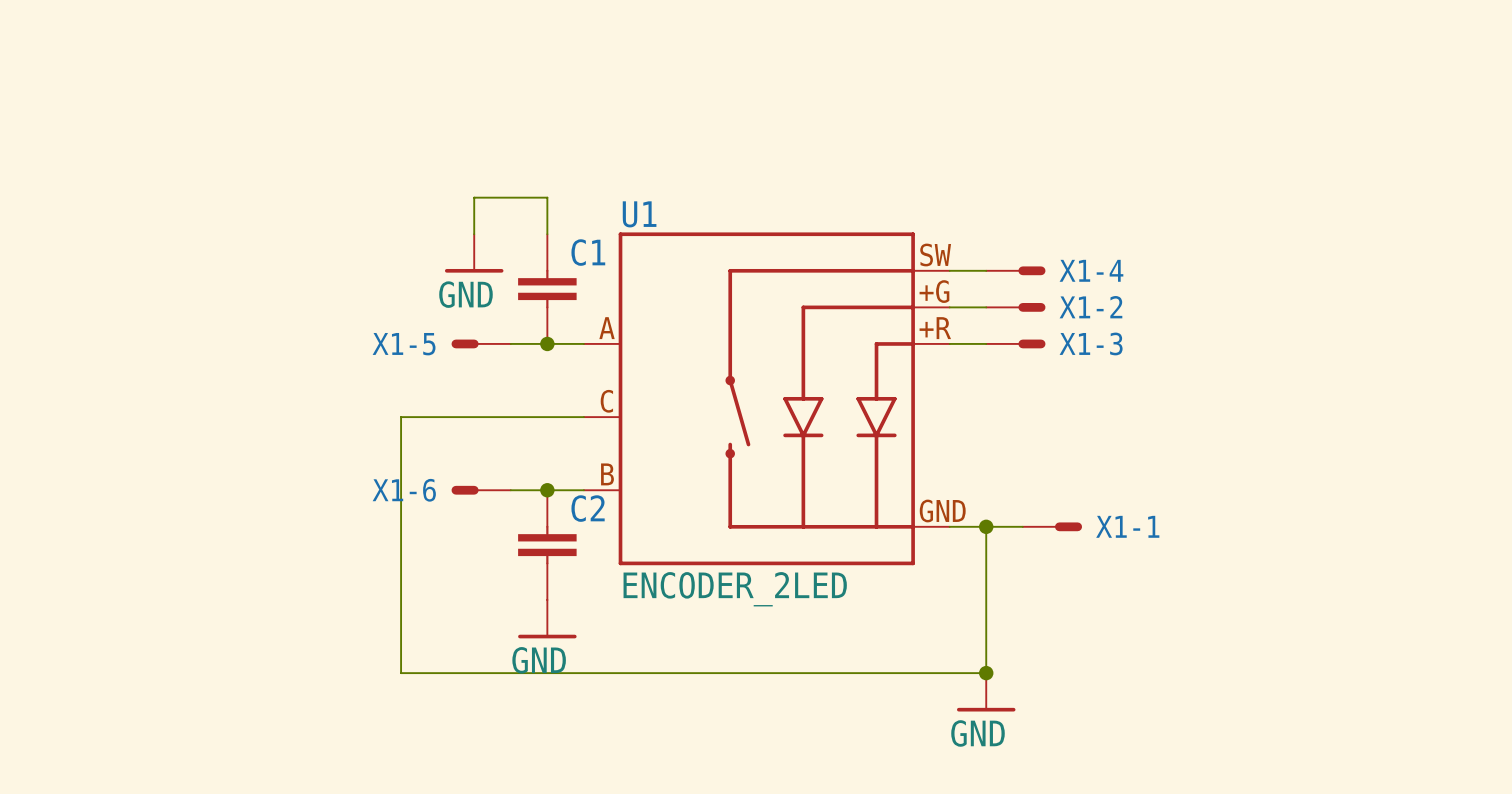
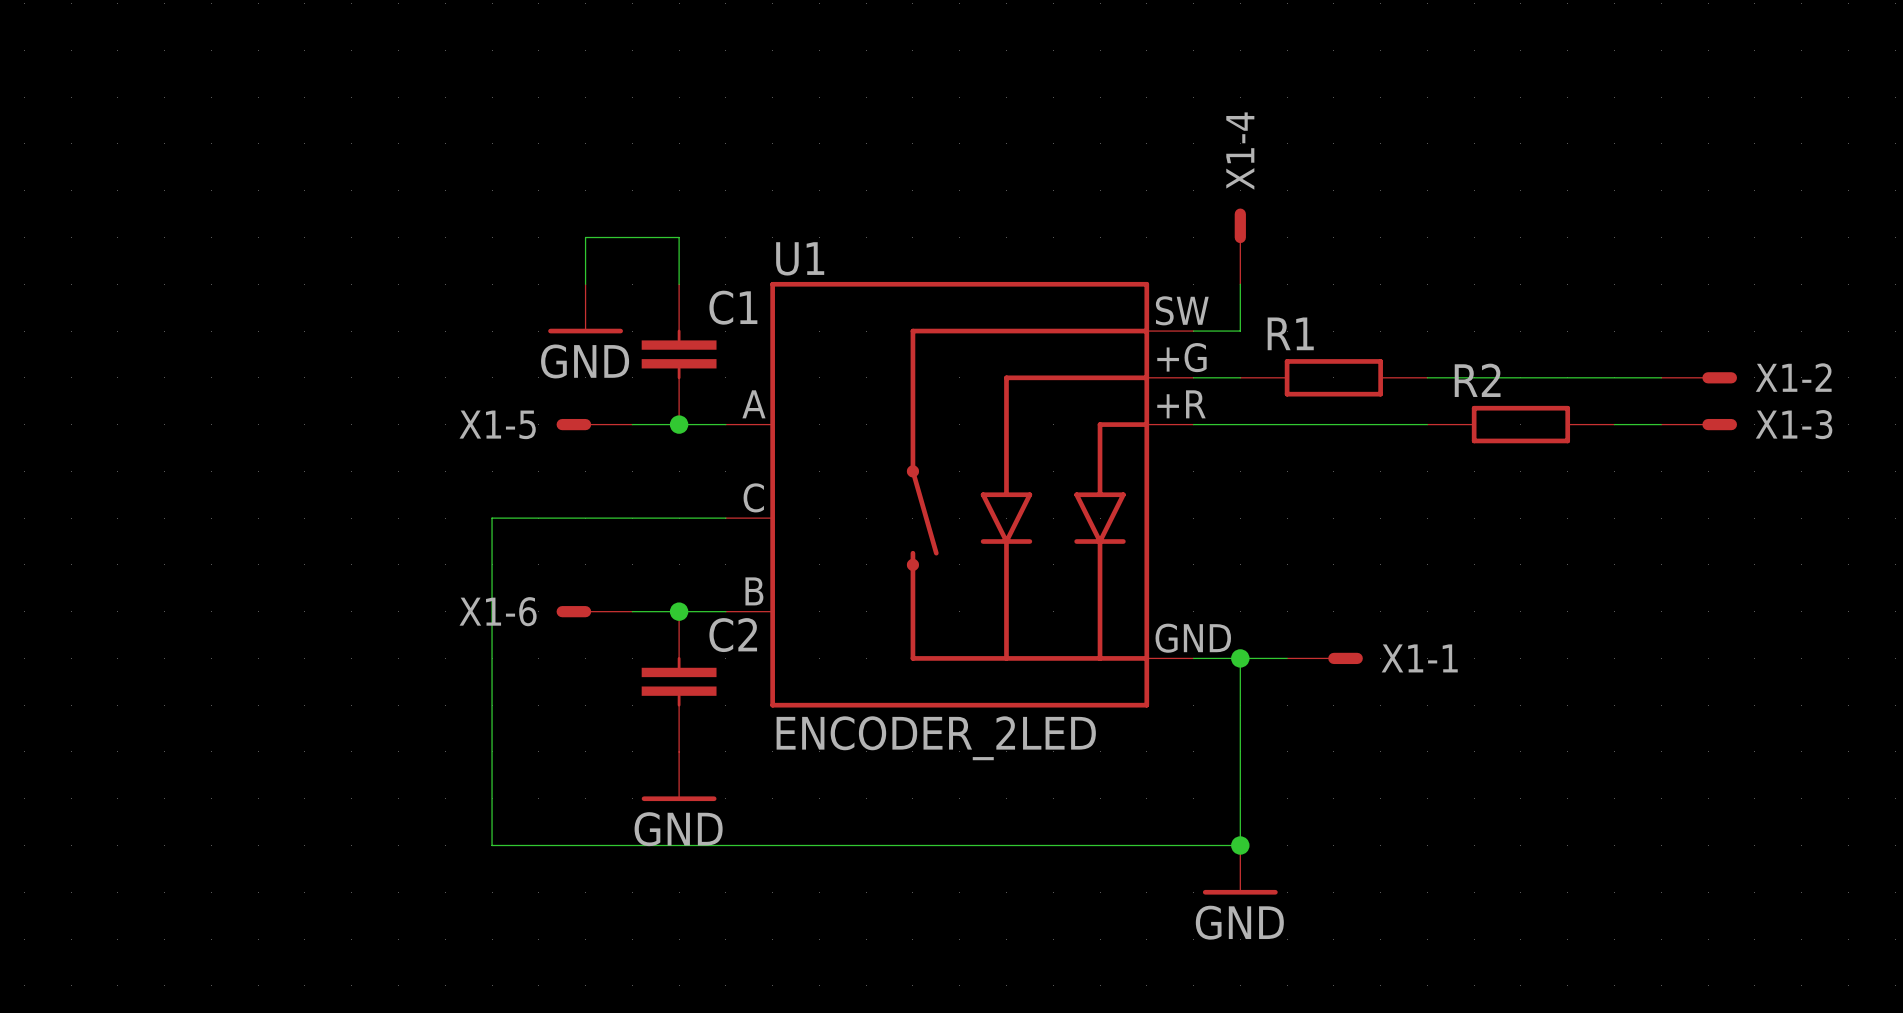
wire: none -> (1240, 284) (1240, 331)
X1-4 position: (1015, 270) -> (1240, 246)
X1-4 rotation: 0° (1031, 270) -> 90° counterclockwise (1240, 225)
X1-2 position: (1015, 307) -> (1699, 377)
R1: none -> (1333, 377)
wire: none -> (1427, 377) (1661, 377)
wire: none -> (1240, 424) (1427, 424)
X1-3 position: (1015, 343) -> (1699, 424)
R2: none -> (1520, 424)
wire: none -> (1614, 424) (1661, 424)

